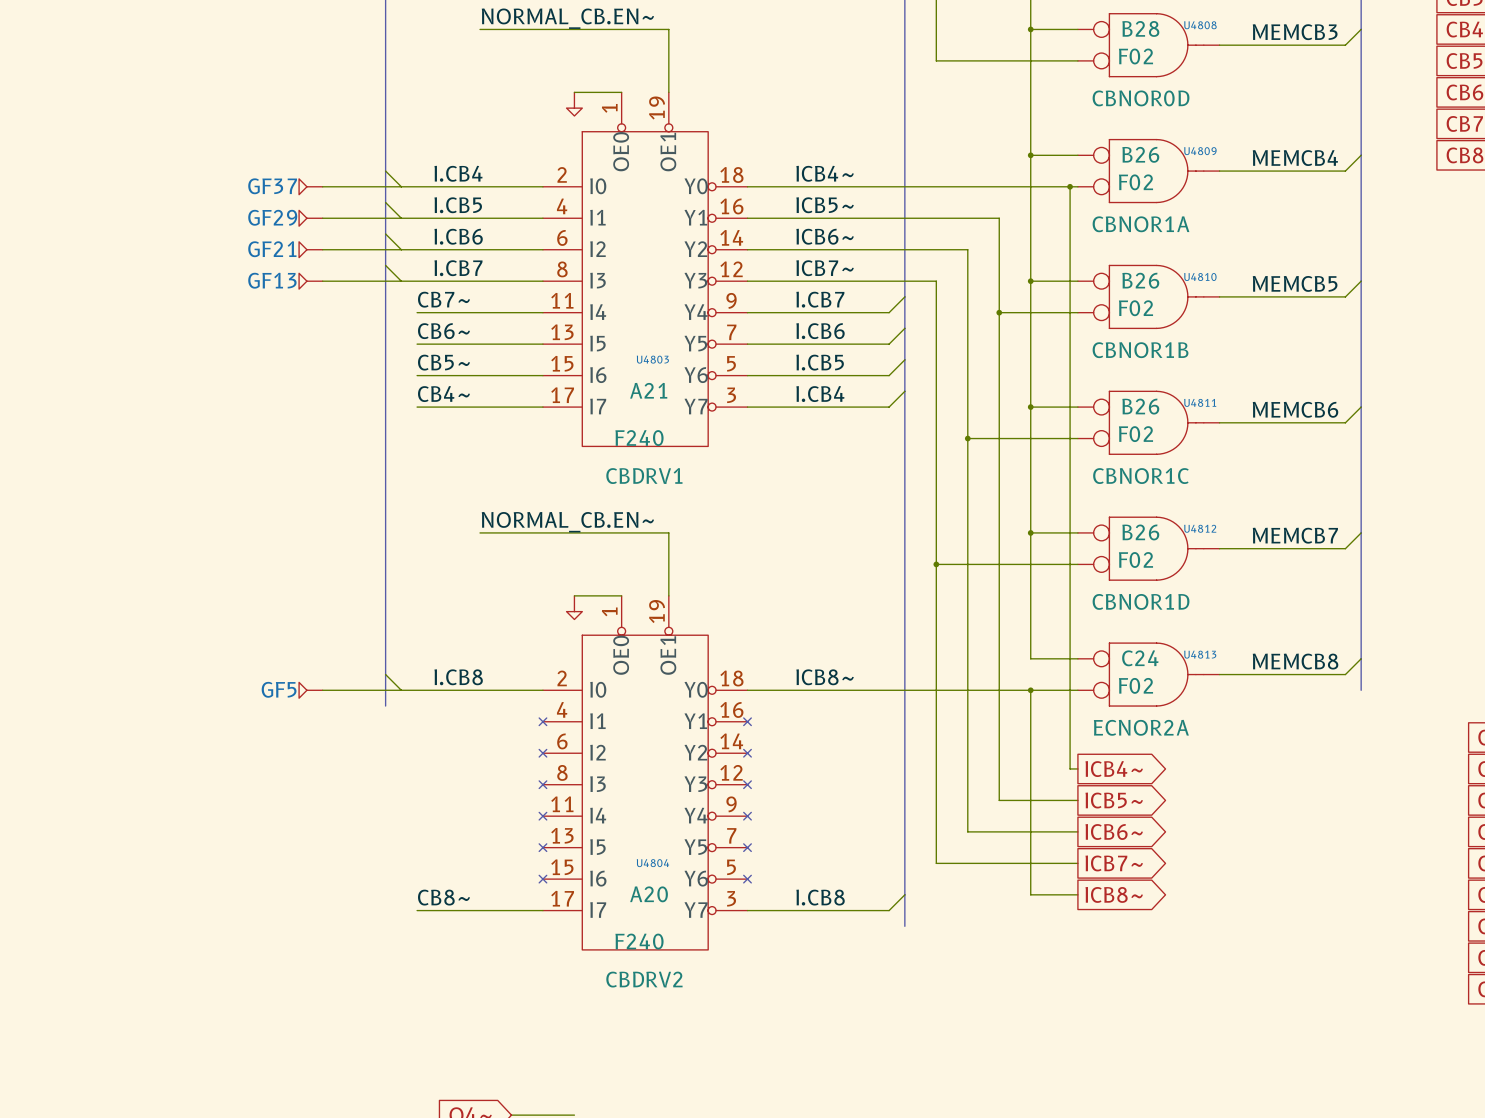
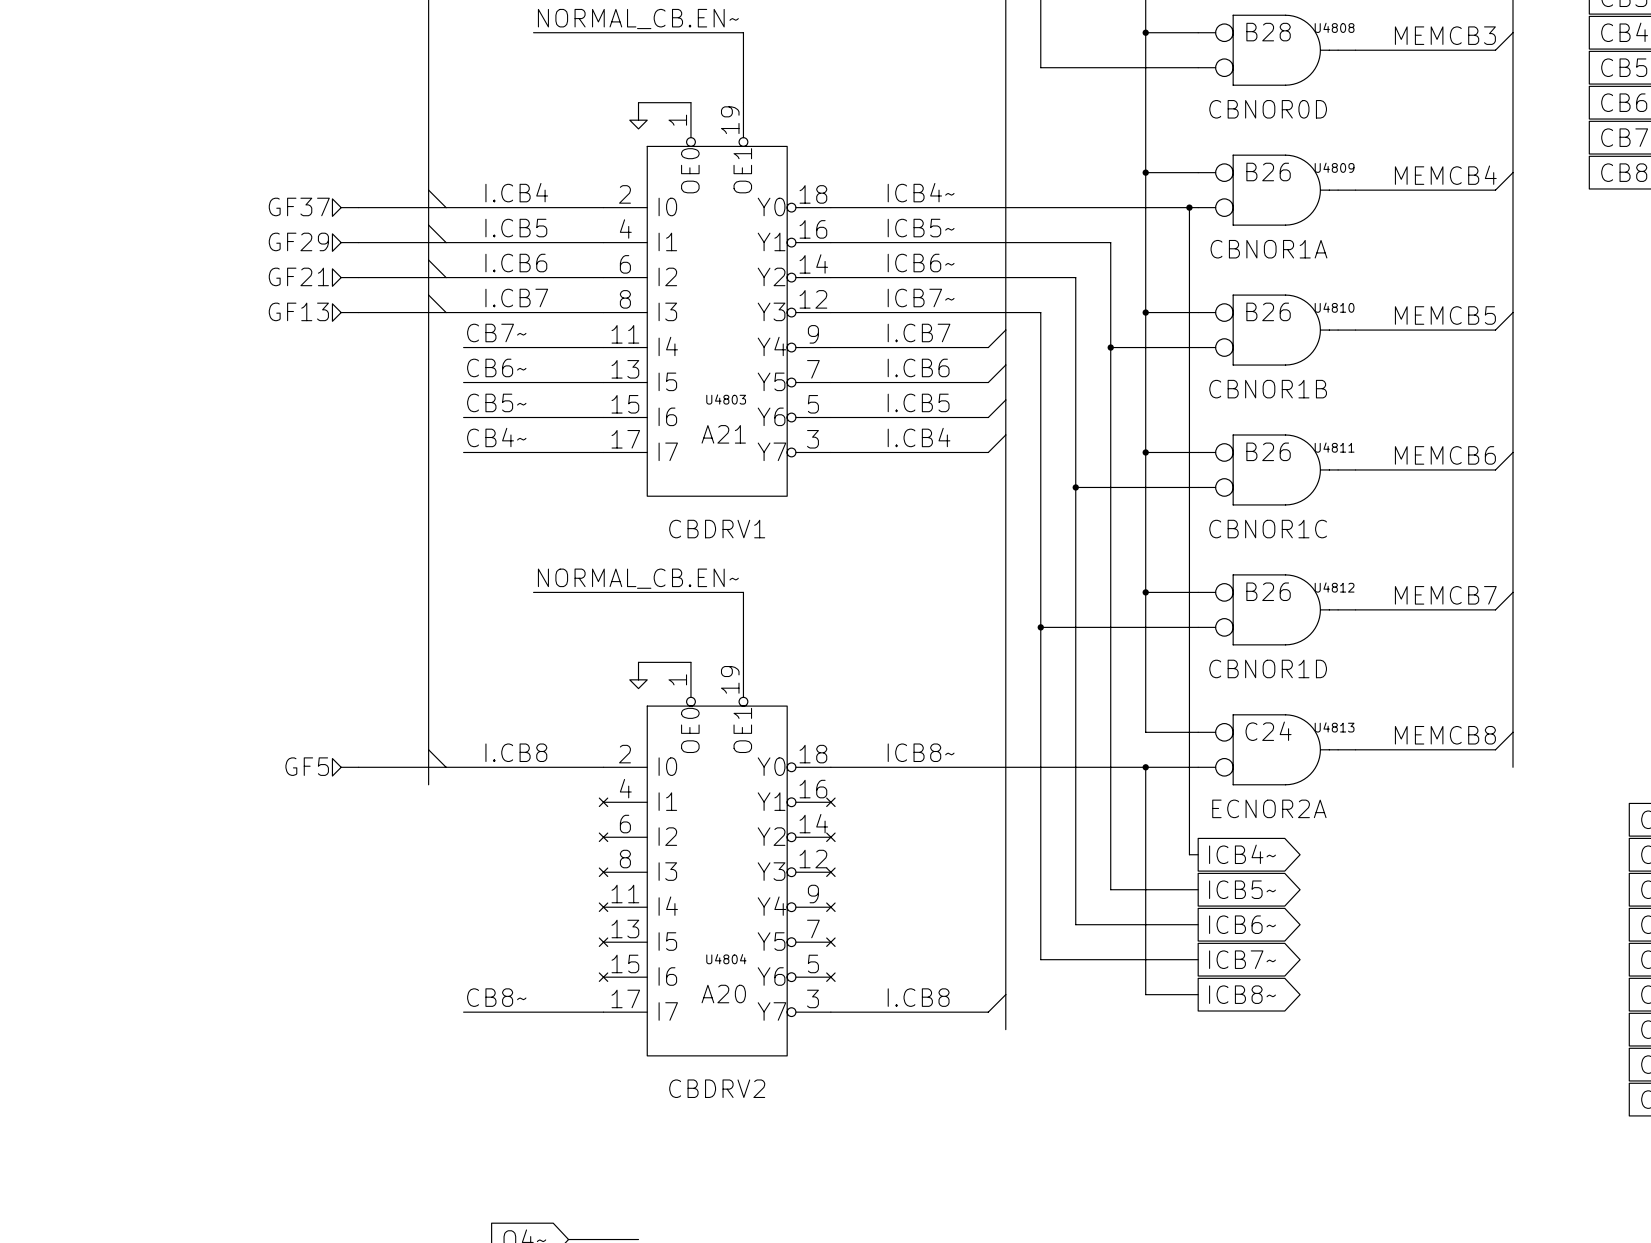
U4808 value: F02 (1135, 56) -> none
U4809 value: F02 (1135, 182) -> none
U4810 value: F02 (1135, 308) -> none
U4811 value: F02 (1135, 434) -> none
U4803 value: F240 (639, 438) -> none
U4812 value: F02 (1135, 560) -> none
U4813 value: F02 (1135, 685) -> none
U4804 value: F240 (639, 941) -> none

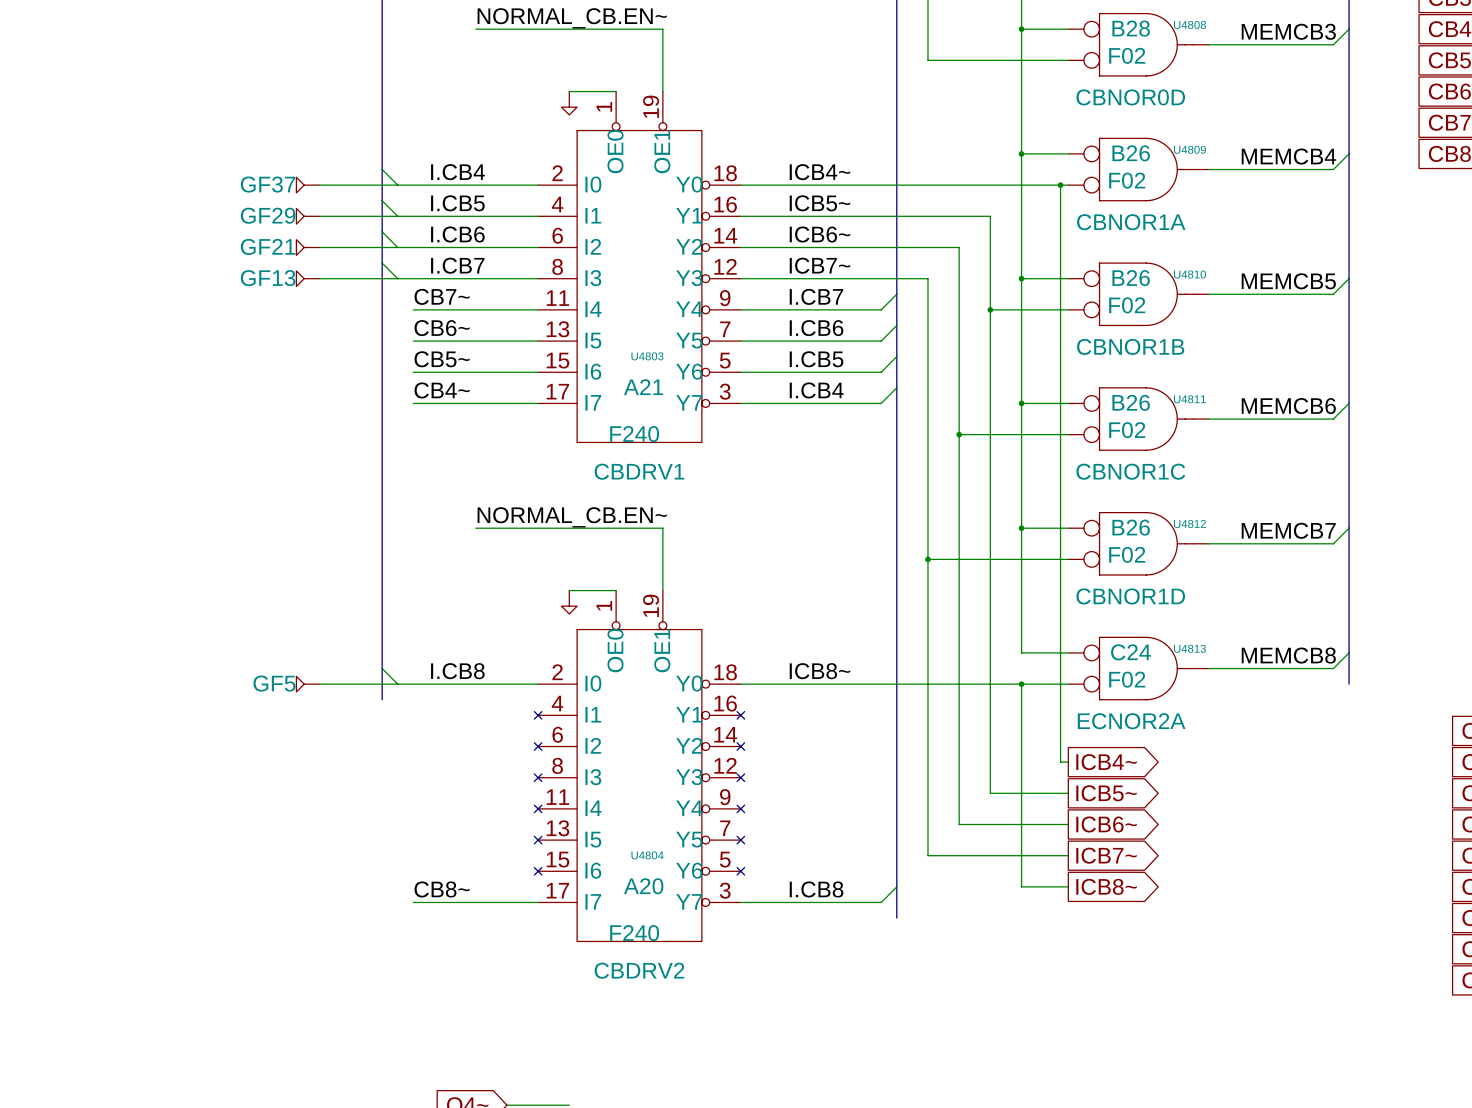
U4808 value: none -> F02 (1127, 55)
U4809 value: none -> F02 (1127, 180)
U4810 value: none -> F02 (1127, 305)
U4811 value: none -> F02 (1127, 430)
U4803 value: none -> F240 (634, 434)
U4812 value: none -> F02 (1127, 554)
U4813 value: none -> F02 (1127, 679)
U4804 value: none -> F240 (634, 933)

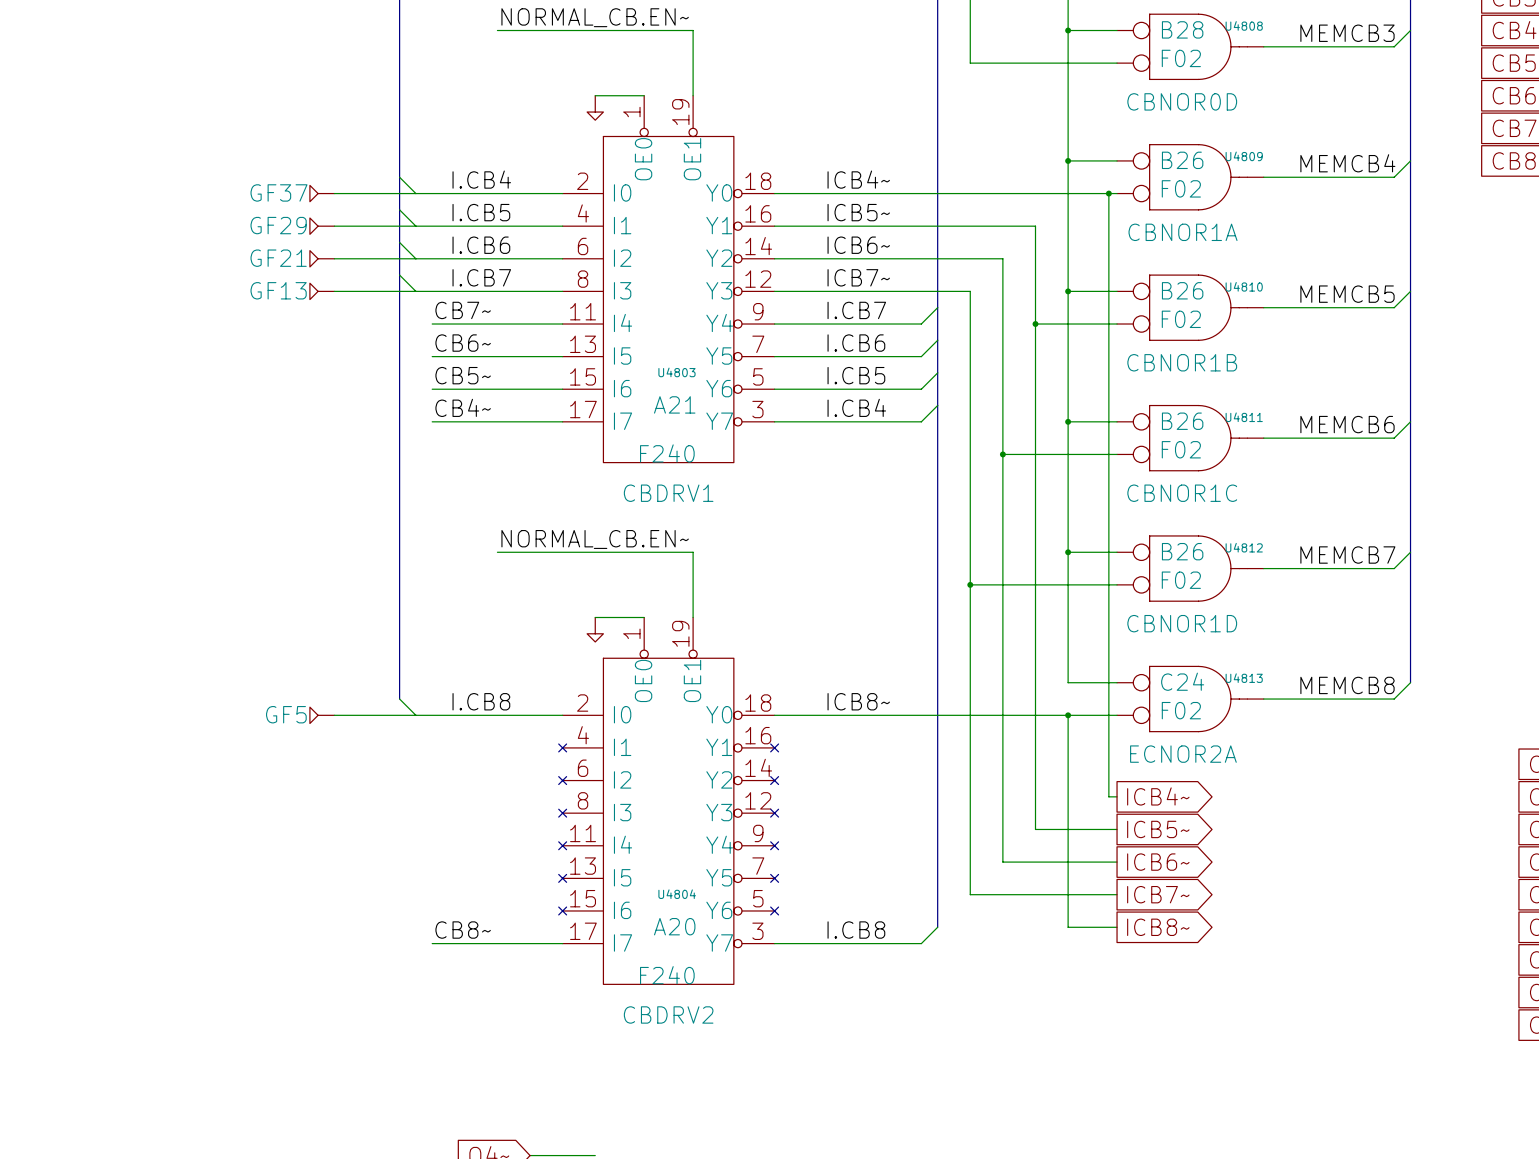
bus: (1349, 652) (1349, 684) -> none
bus: (382, 668) (382, 699) -> none
bus: (896, 886) (896, 918) -> none

